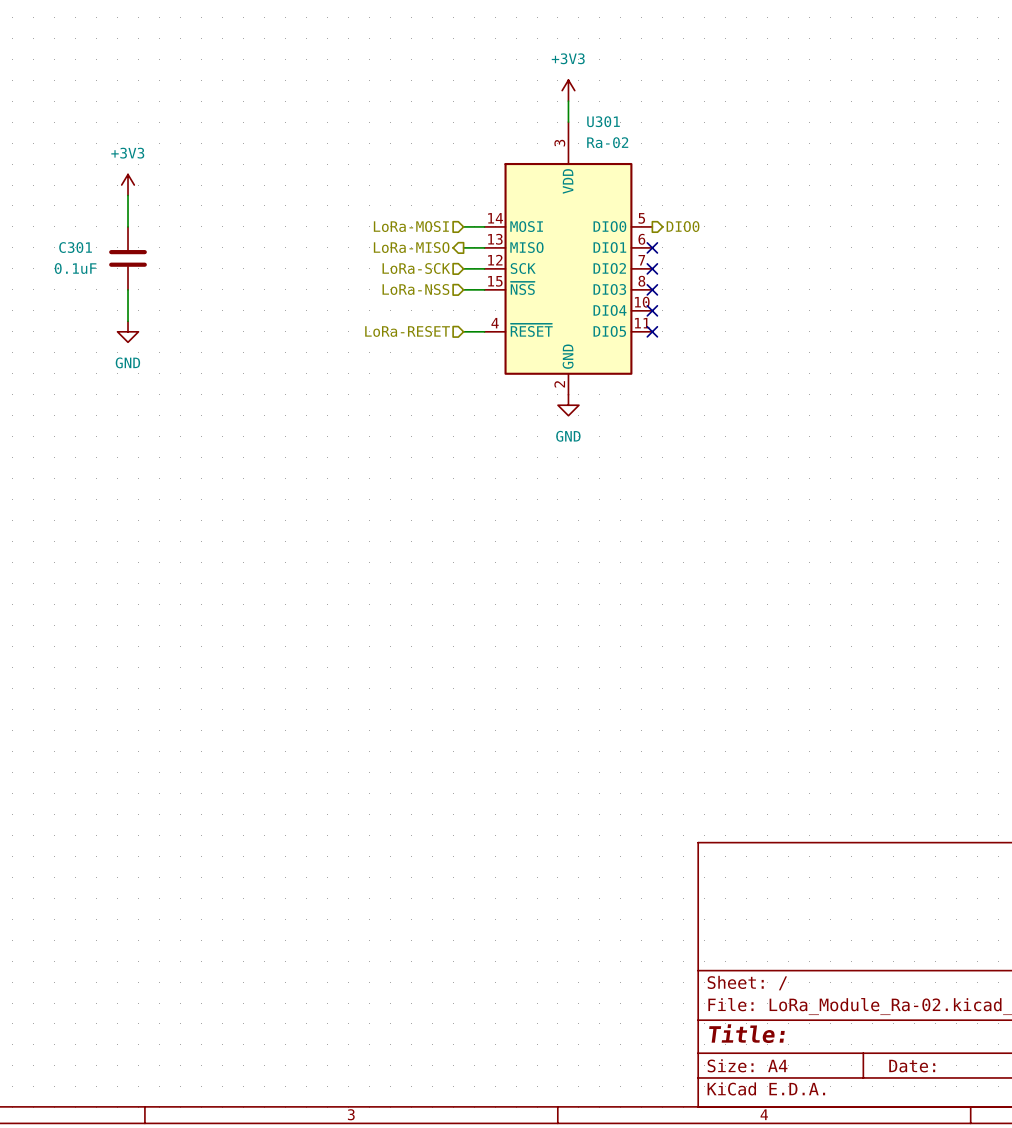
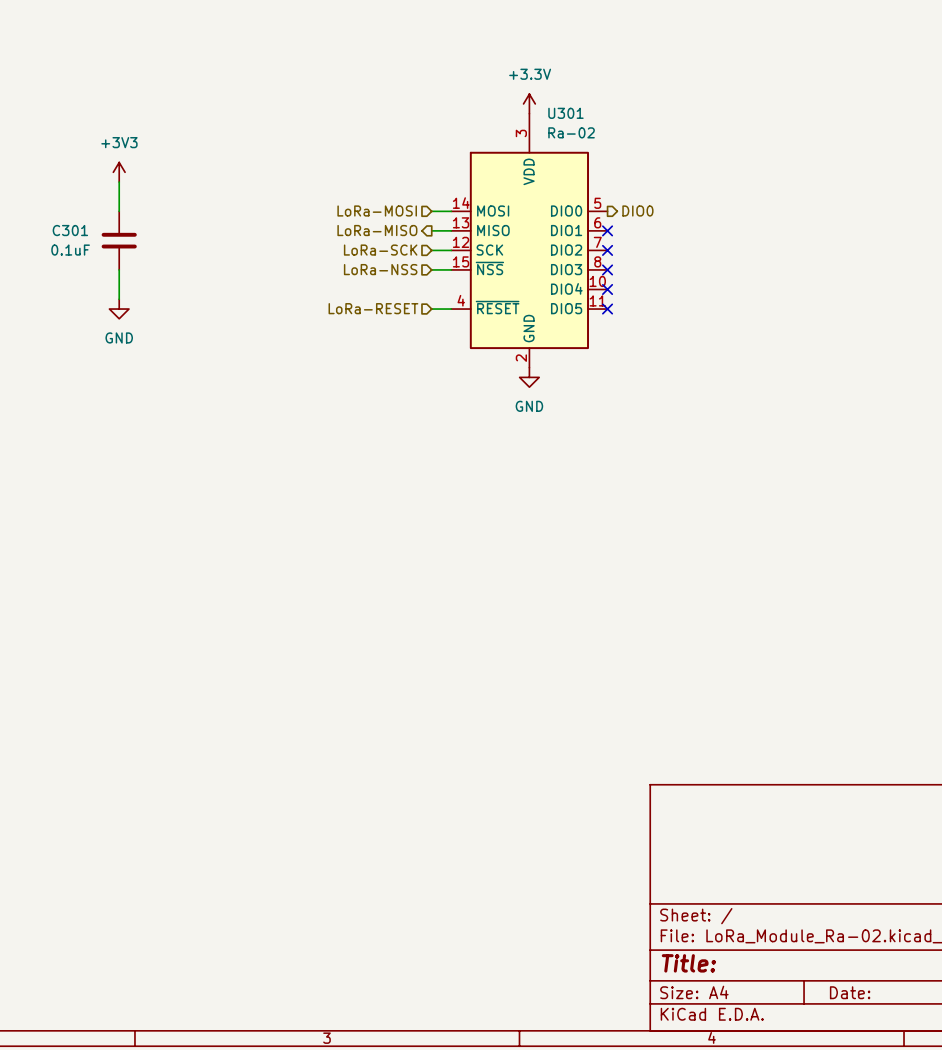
power symbol: +3V3 (568, 90) -> none
power symbol: none -> +3.3V (529, 103)

